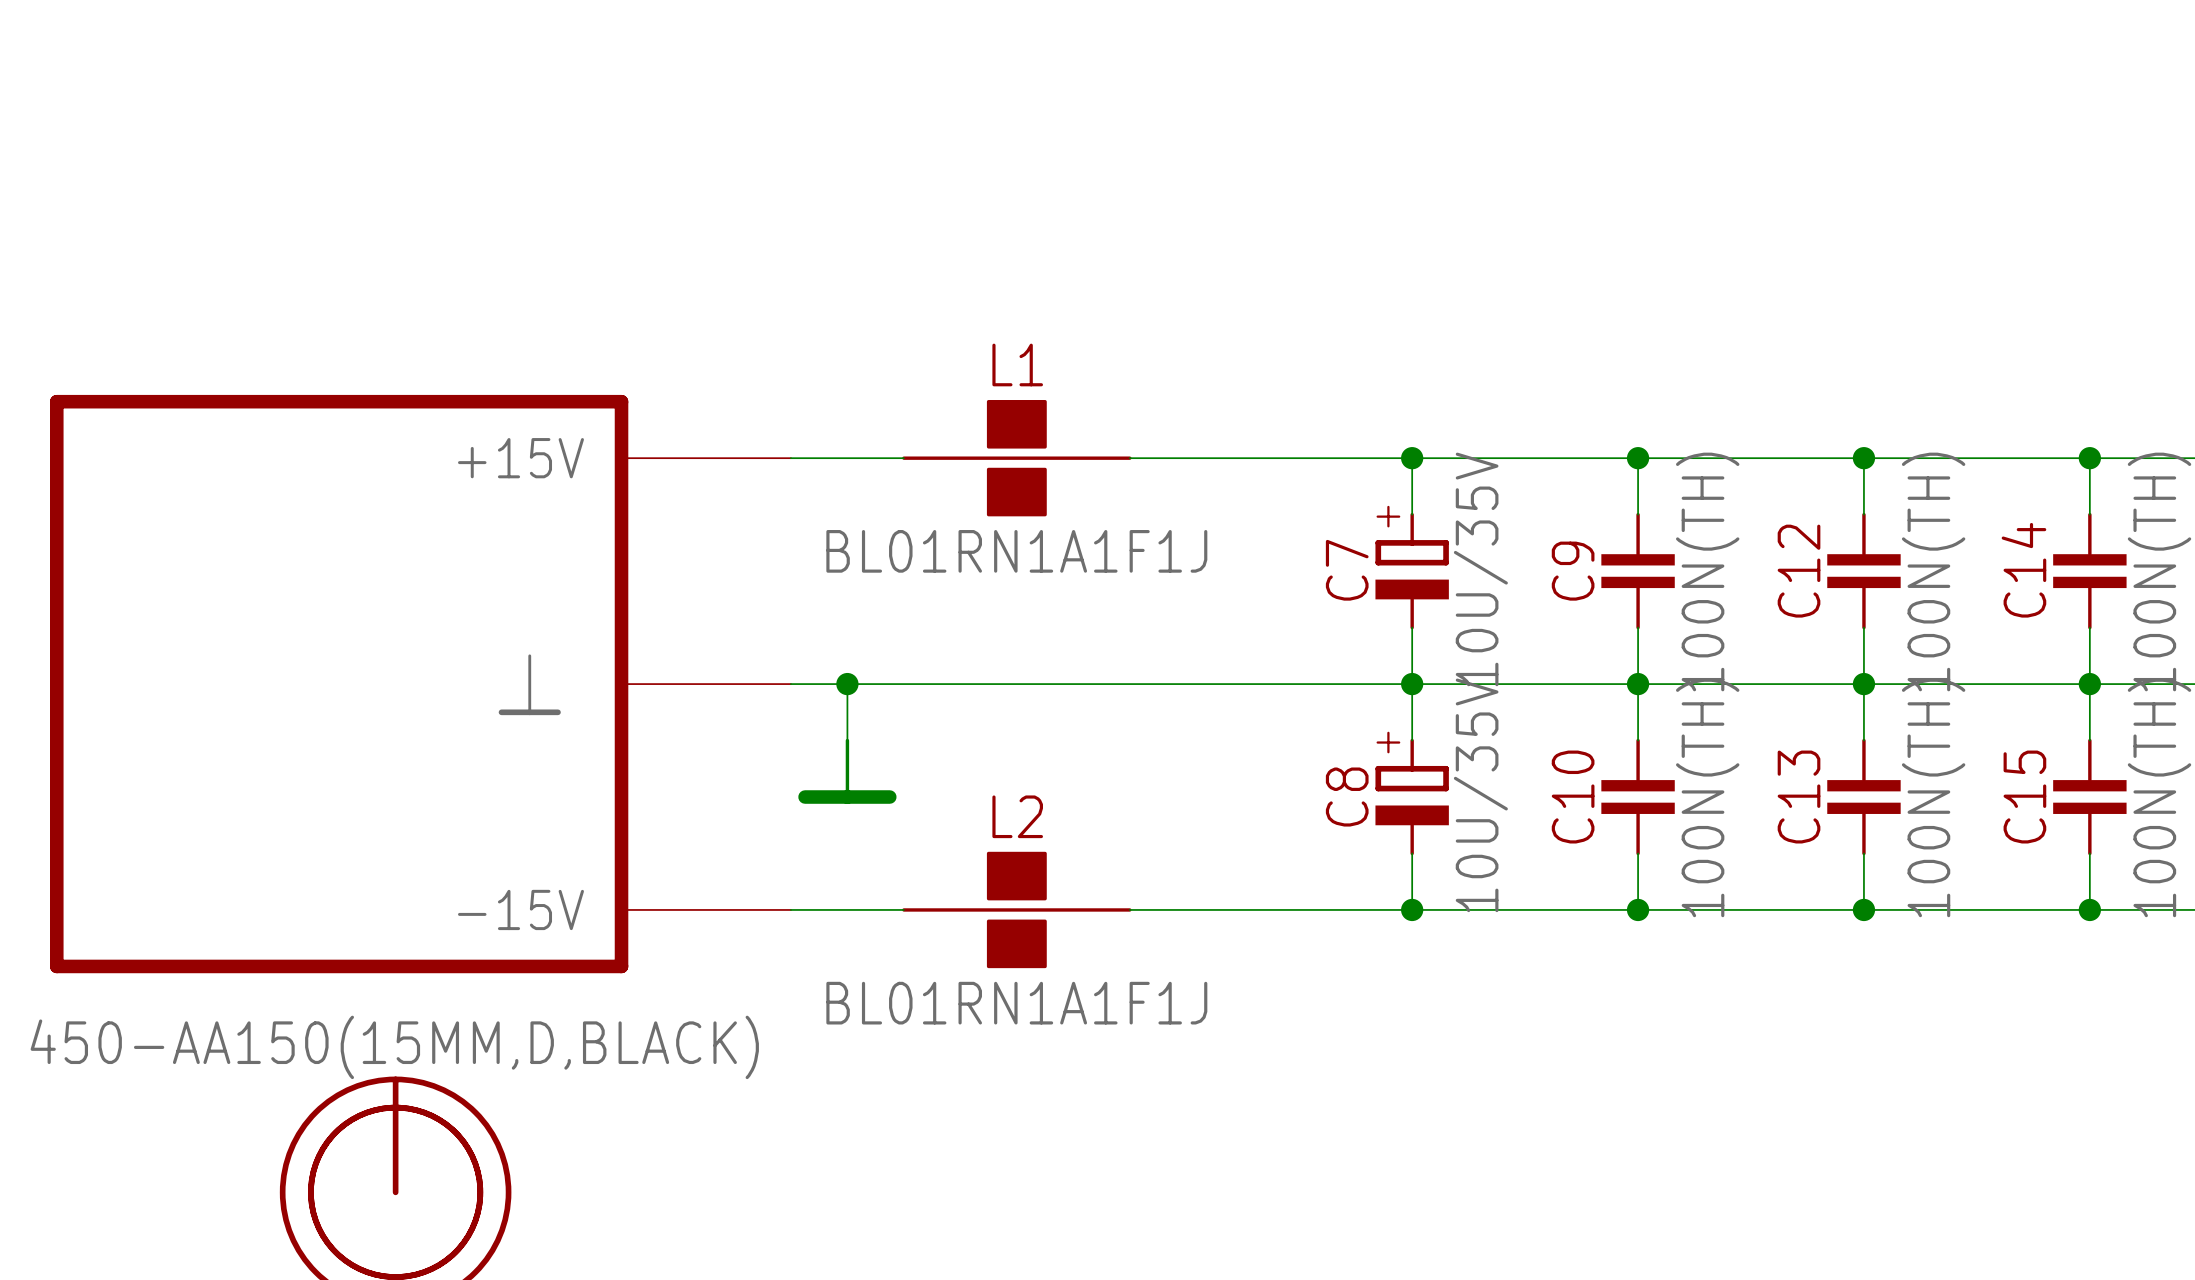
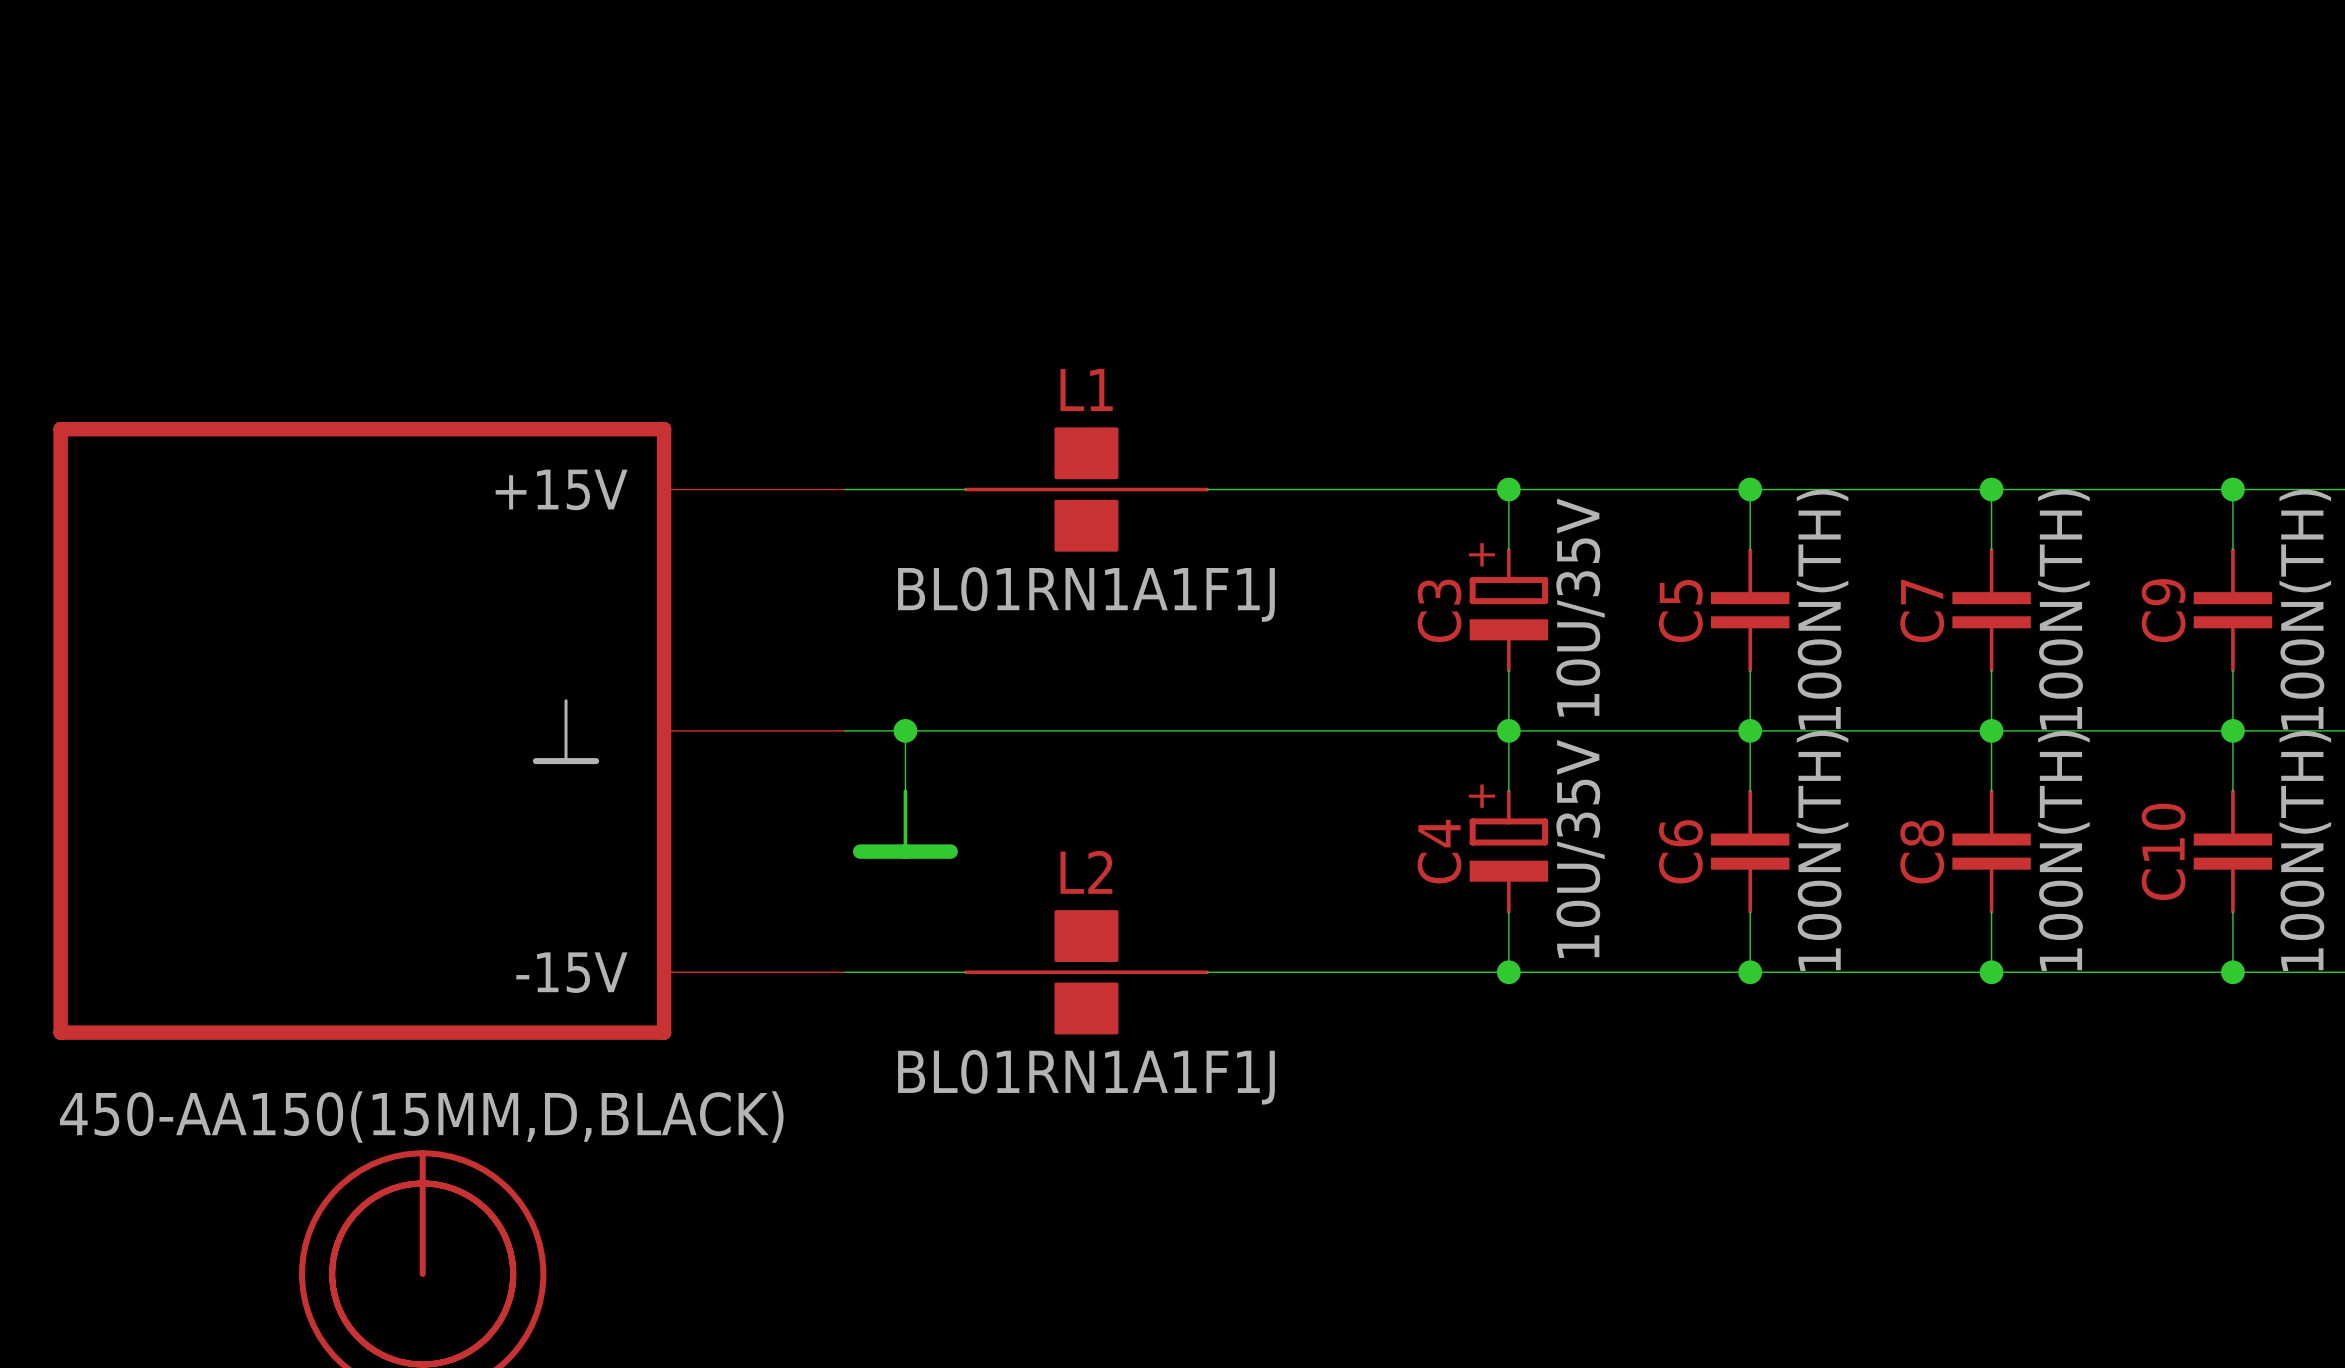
C7 name: C7 (1347, 570) -> C3 (1439, 610)
C14 name: C14 (2023, 570) -> C9 (2163, 610)
C9 name: C9 (1573, 571) -> C5 (1680, 611)
C12 name: C12 (1799, 571) -> C7 (1922, 610)
C8 name: C8 (1347, 797) -> C4 (1439, 851)
C10 name: C10 (1573, 797) -> C6 (1680, 851)
C13 name: C13 (1799, 797) -> C8 (1922, 851)
C15 name: C15 (2024, 797) -> C10 (2163, 851)

